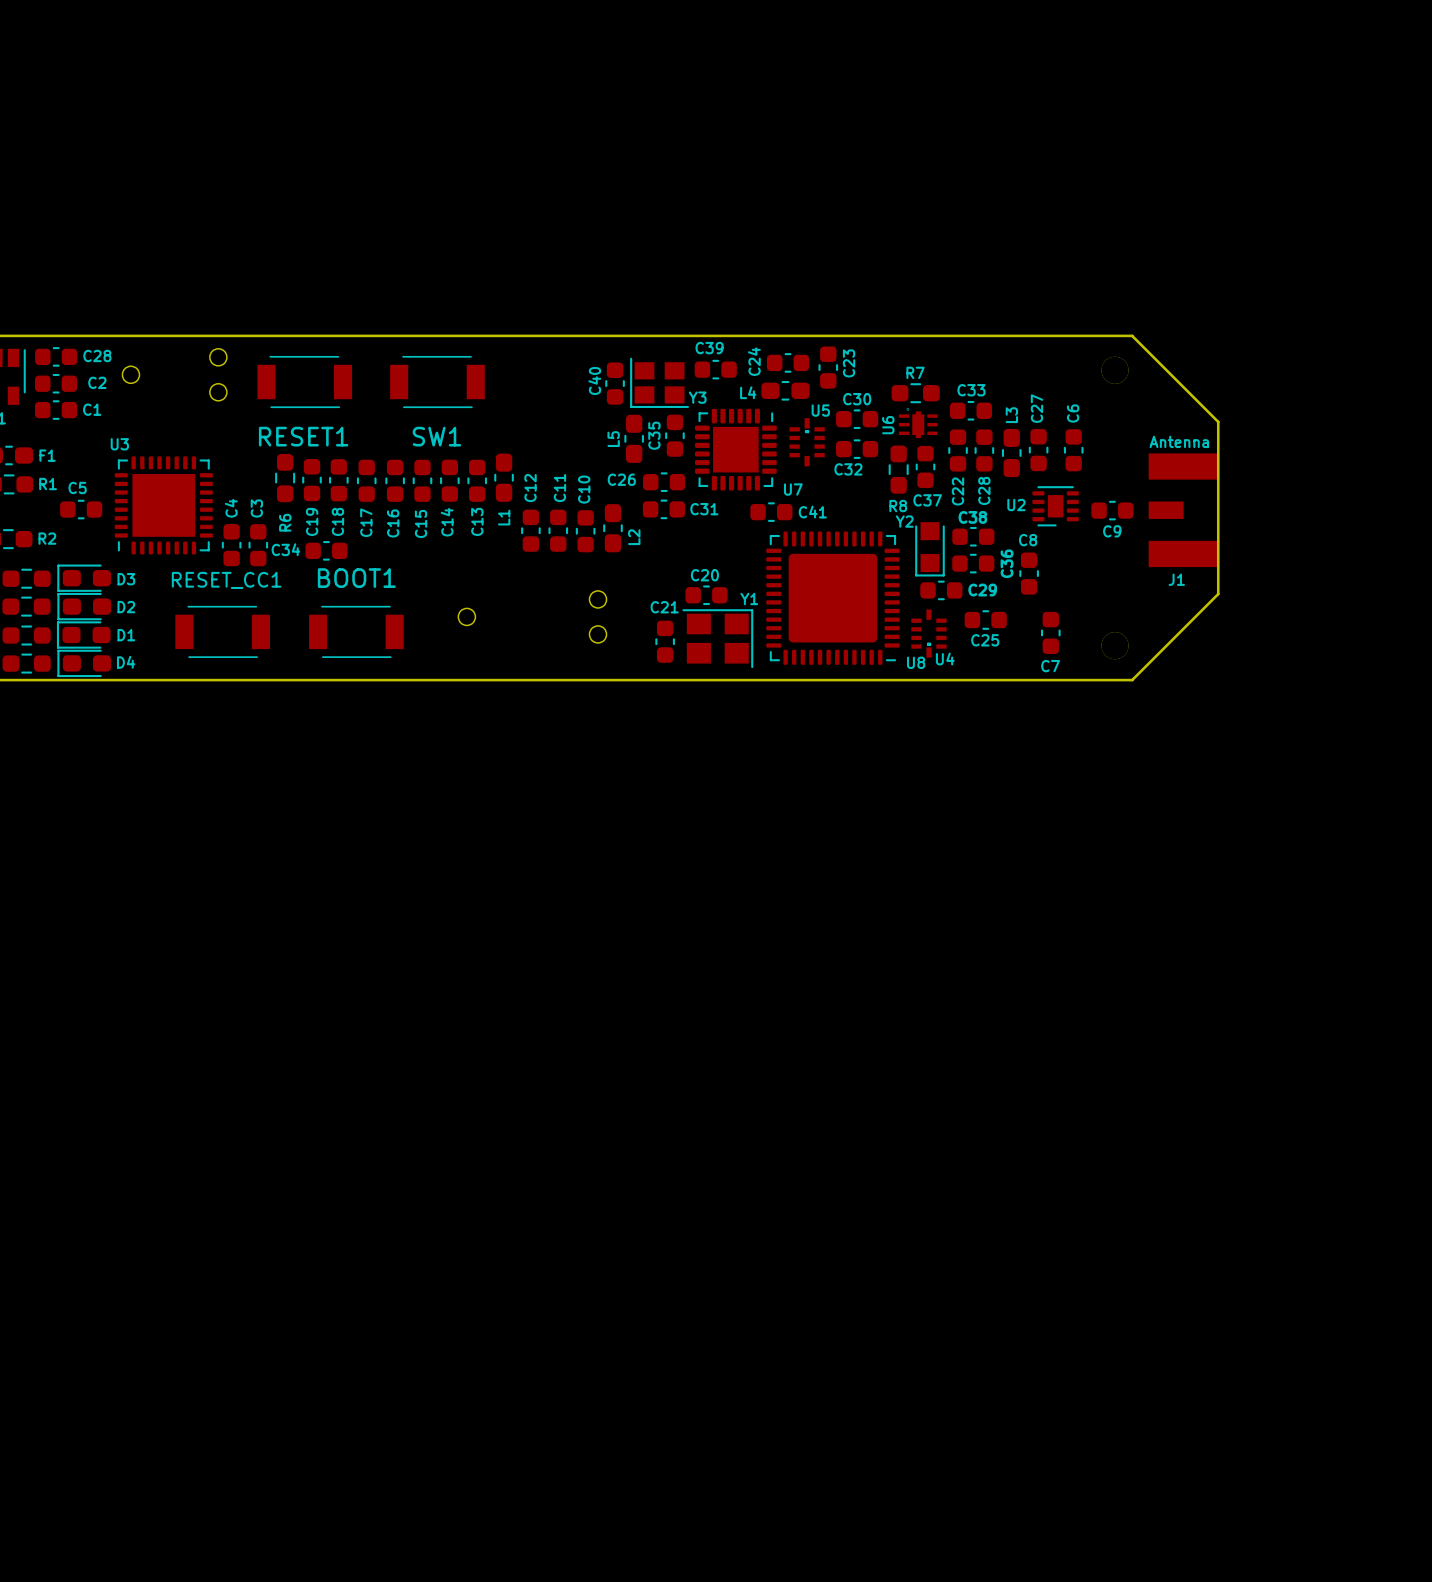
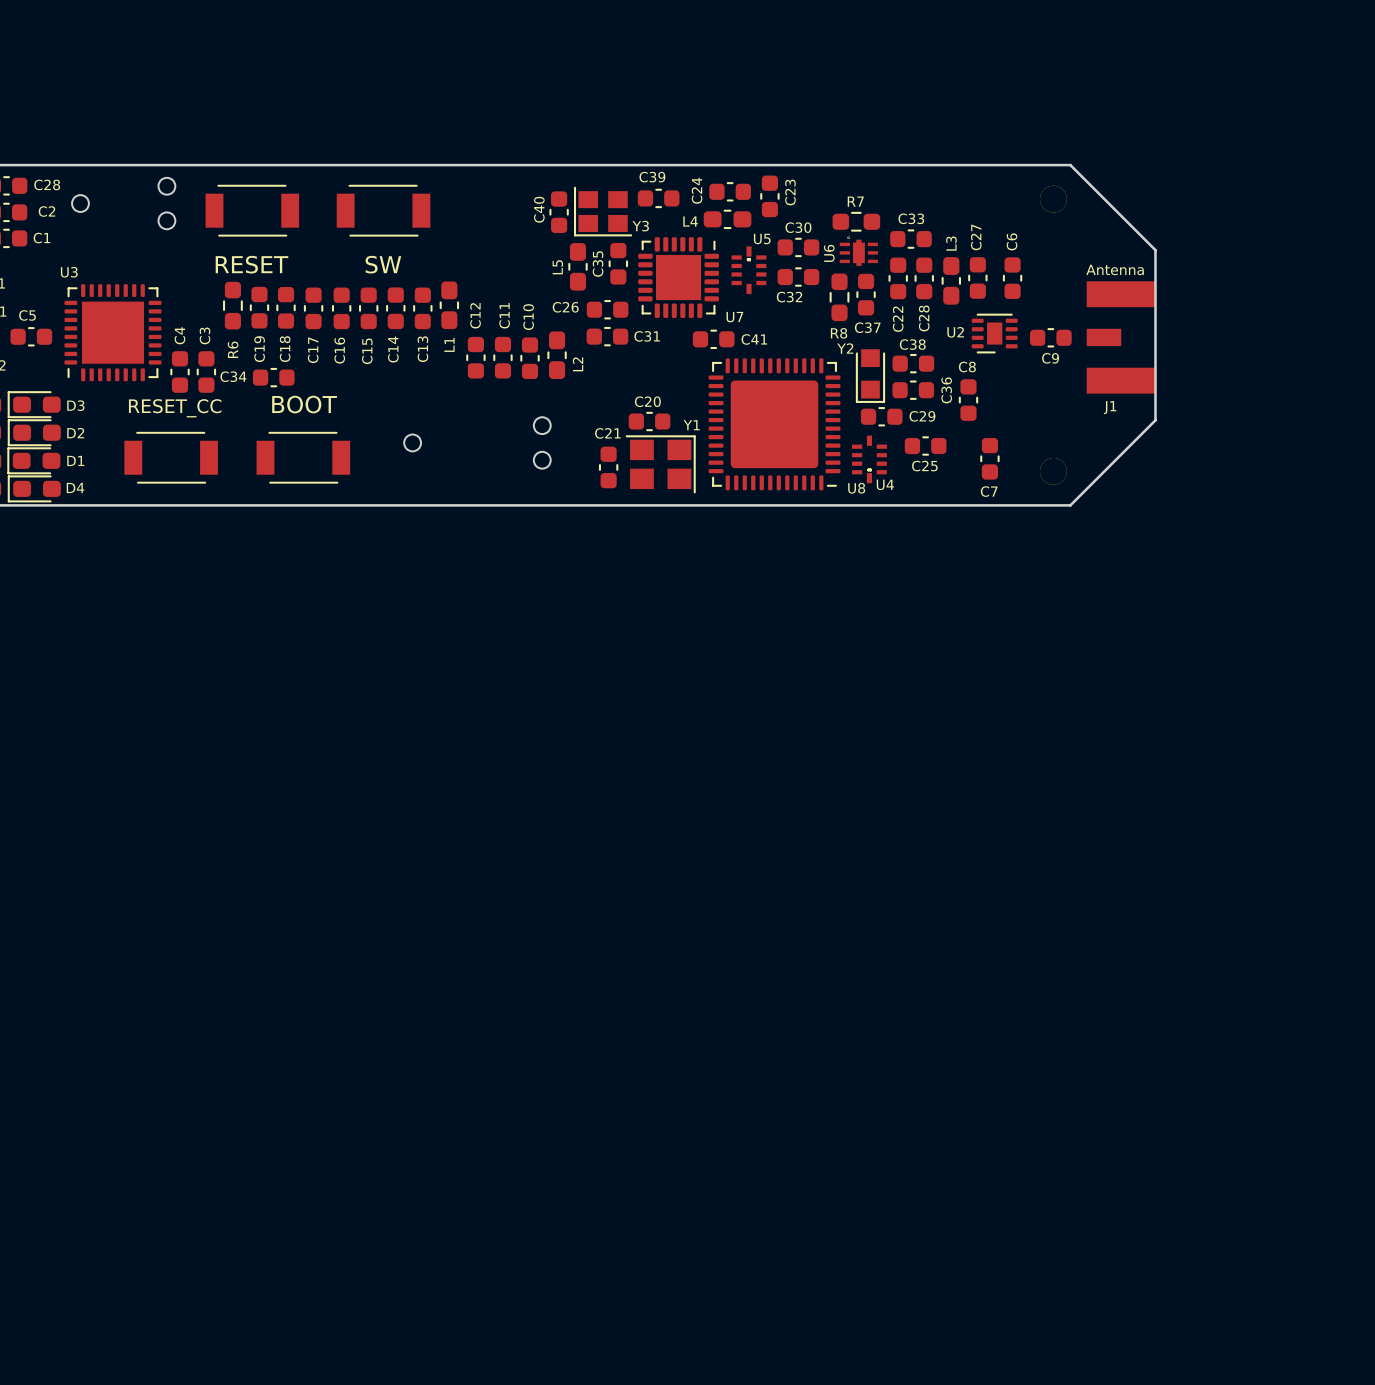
RESET1 name: RESET1 (303, 436) -> RESET (251, 264)
SW1 name: SW1 (436, 436) -> SW (383, 264)
BOOT1 name: BOOT1 (356, 578) -> BOOT (304, 404)
RESET_CC1 name: RESET_CC1 (226, 580) -> RESET_CC (175, 408)

